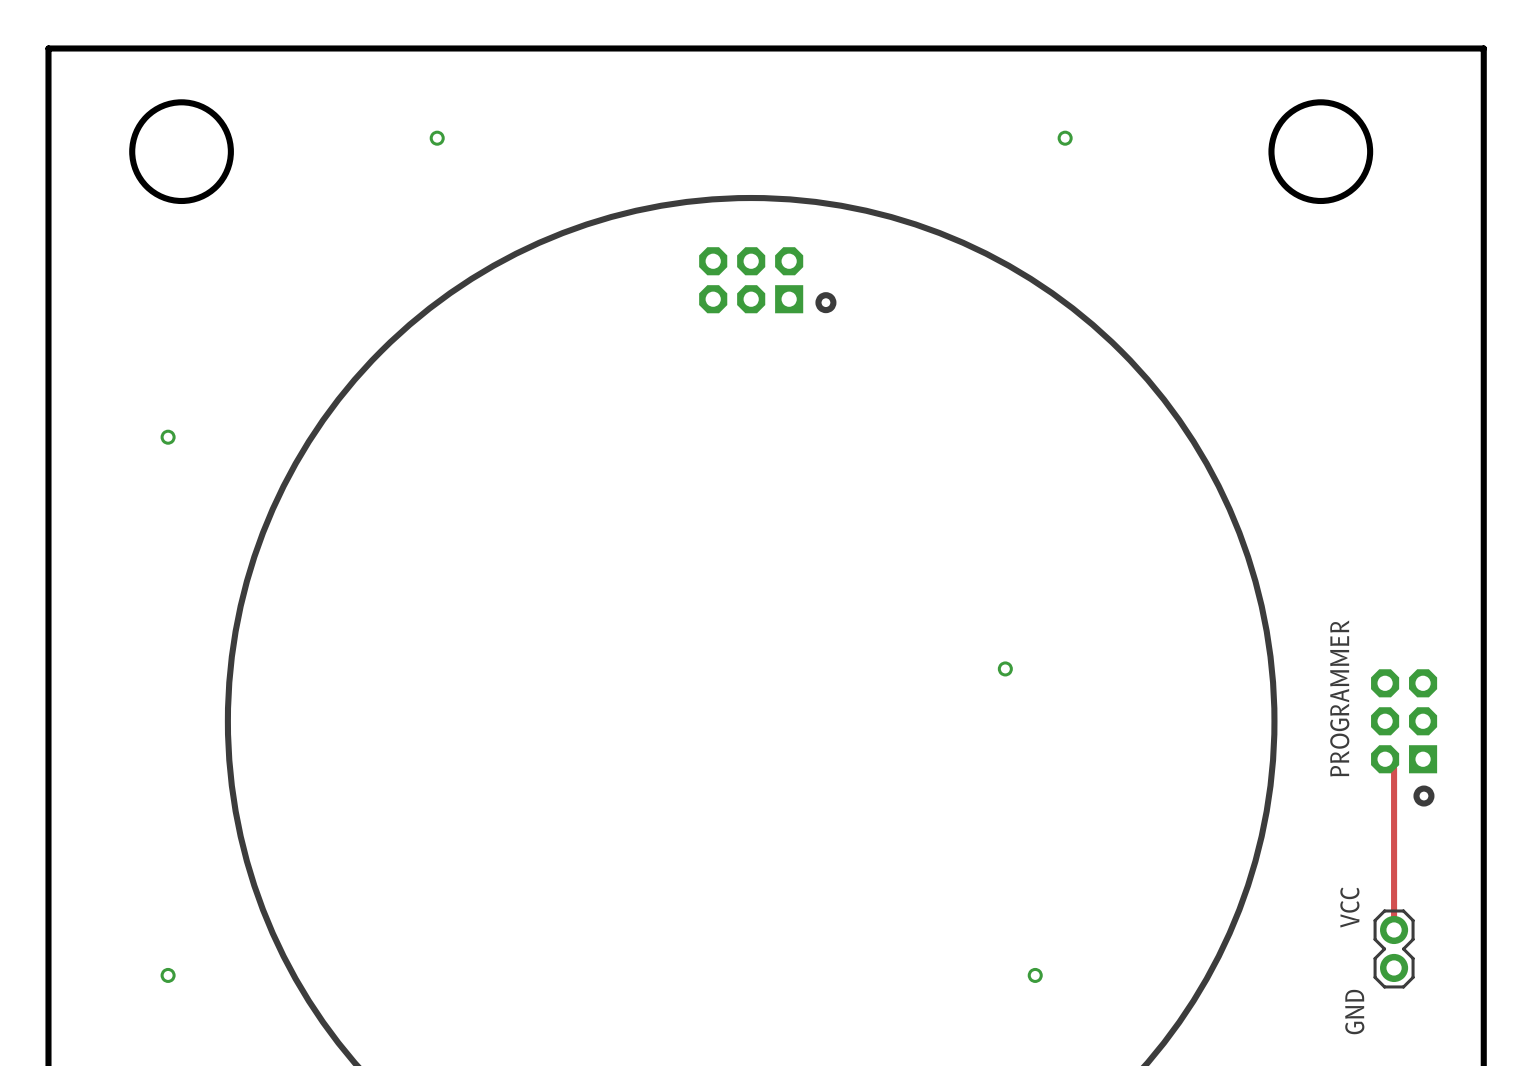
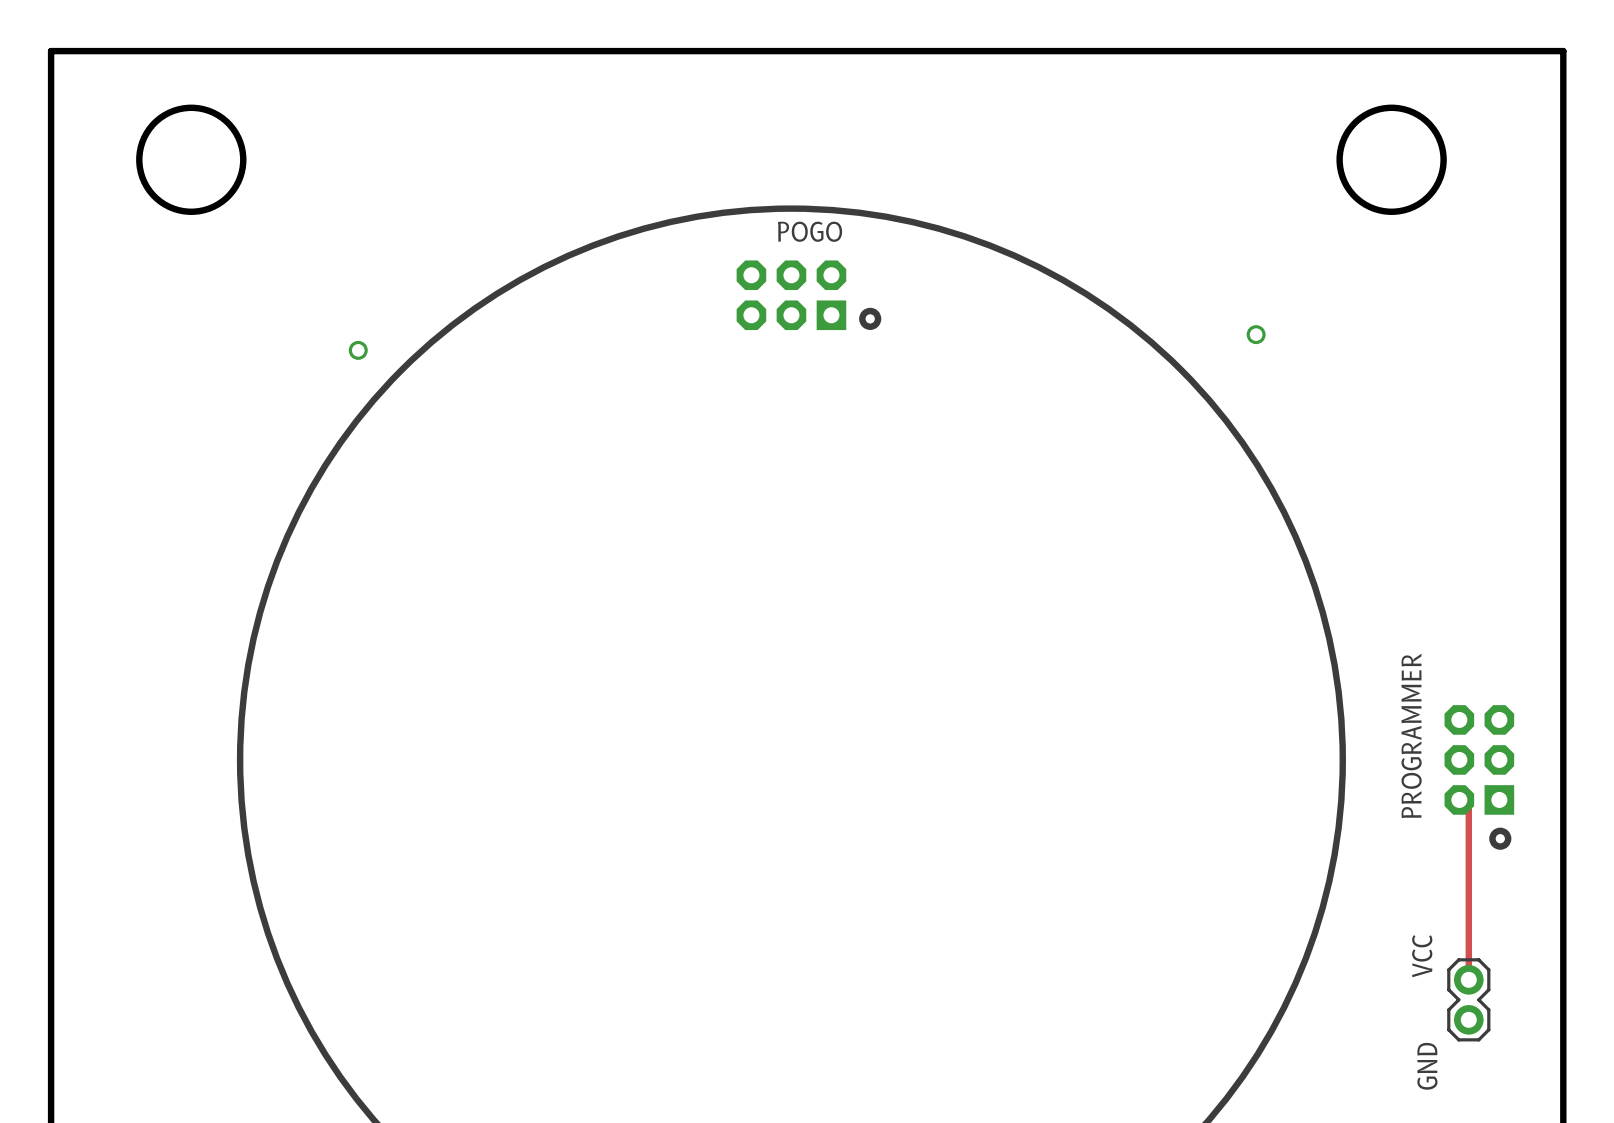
via: (437, 138) -> none
via: (1065, 138) -> none
POGO name: none -> POGO (810, 231)
via: none -> (1256, 334)
via: none -> (358, 350)
via: (168, 437) -> none
via: (1005, 668) -> none
via: (168, 975) -> none
via: (1035, 975) -> none

